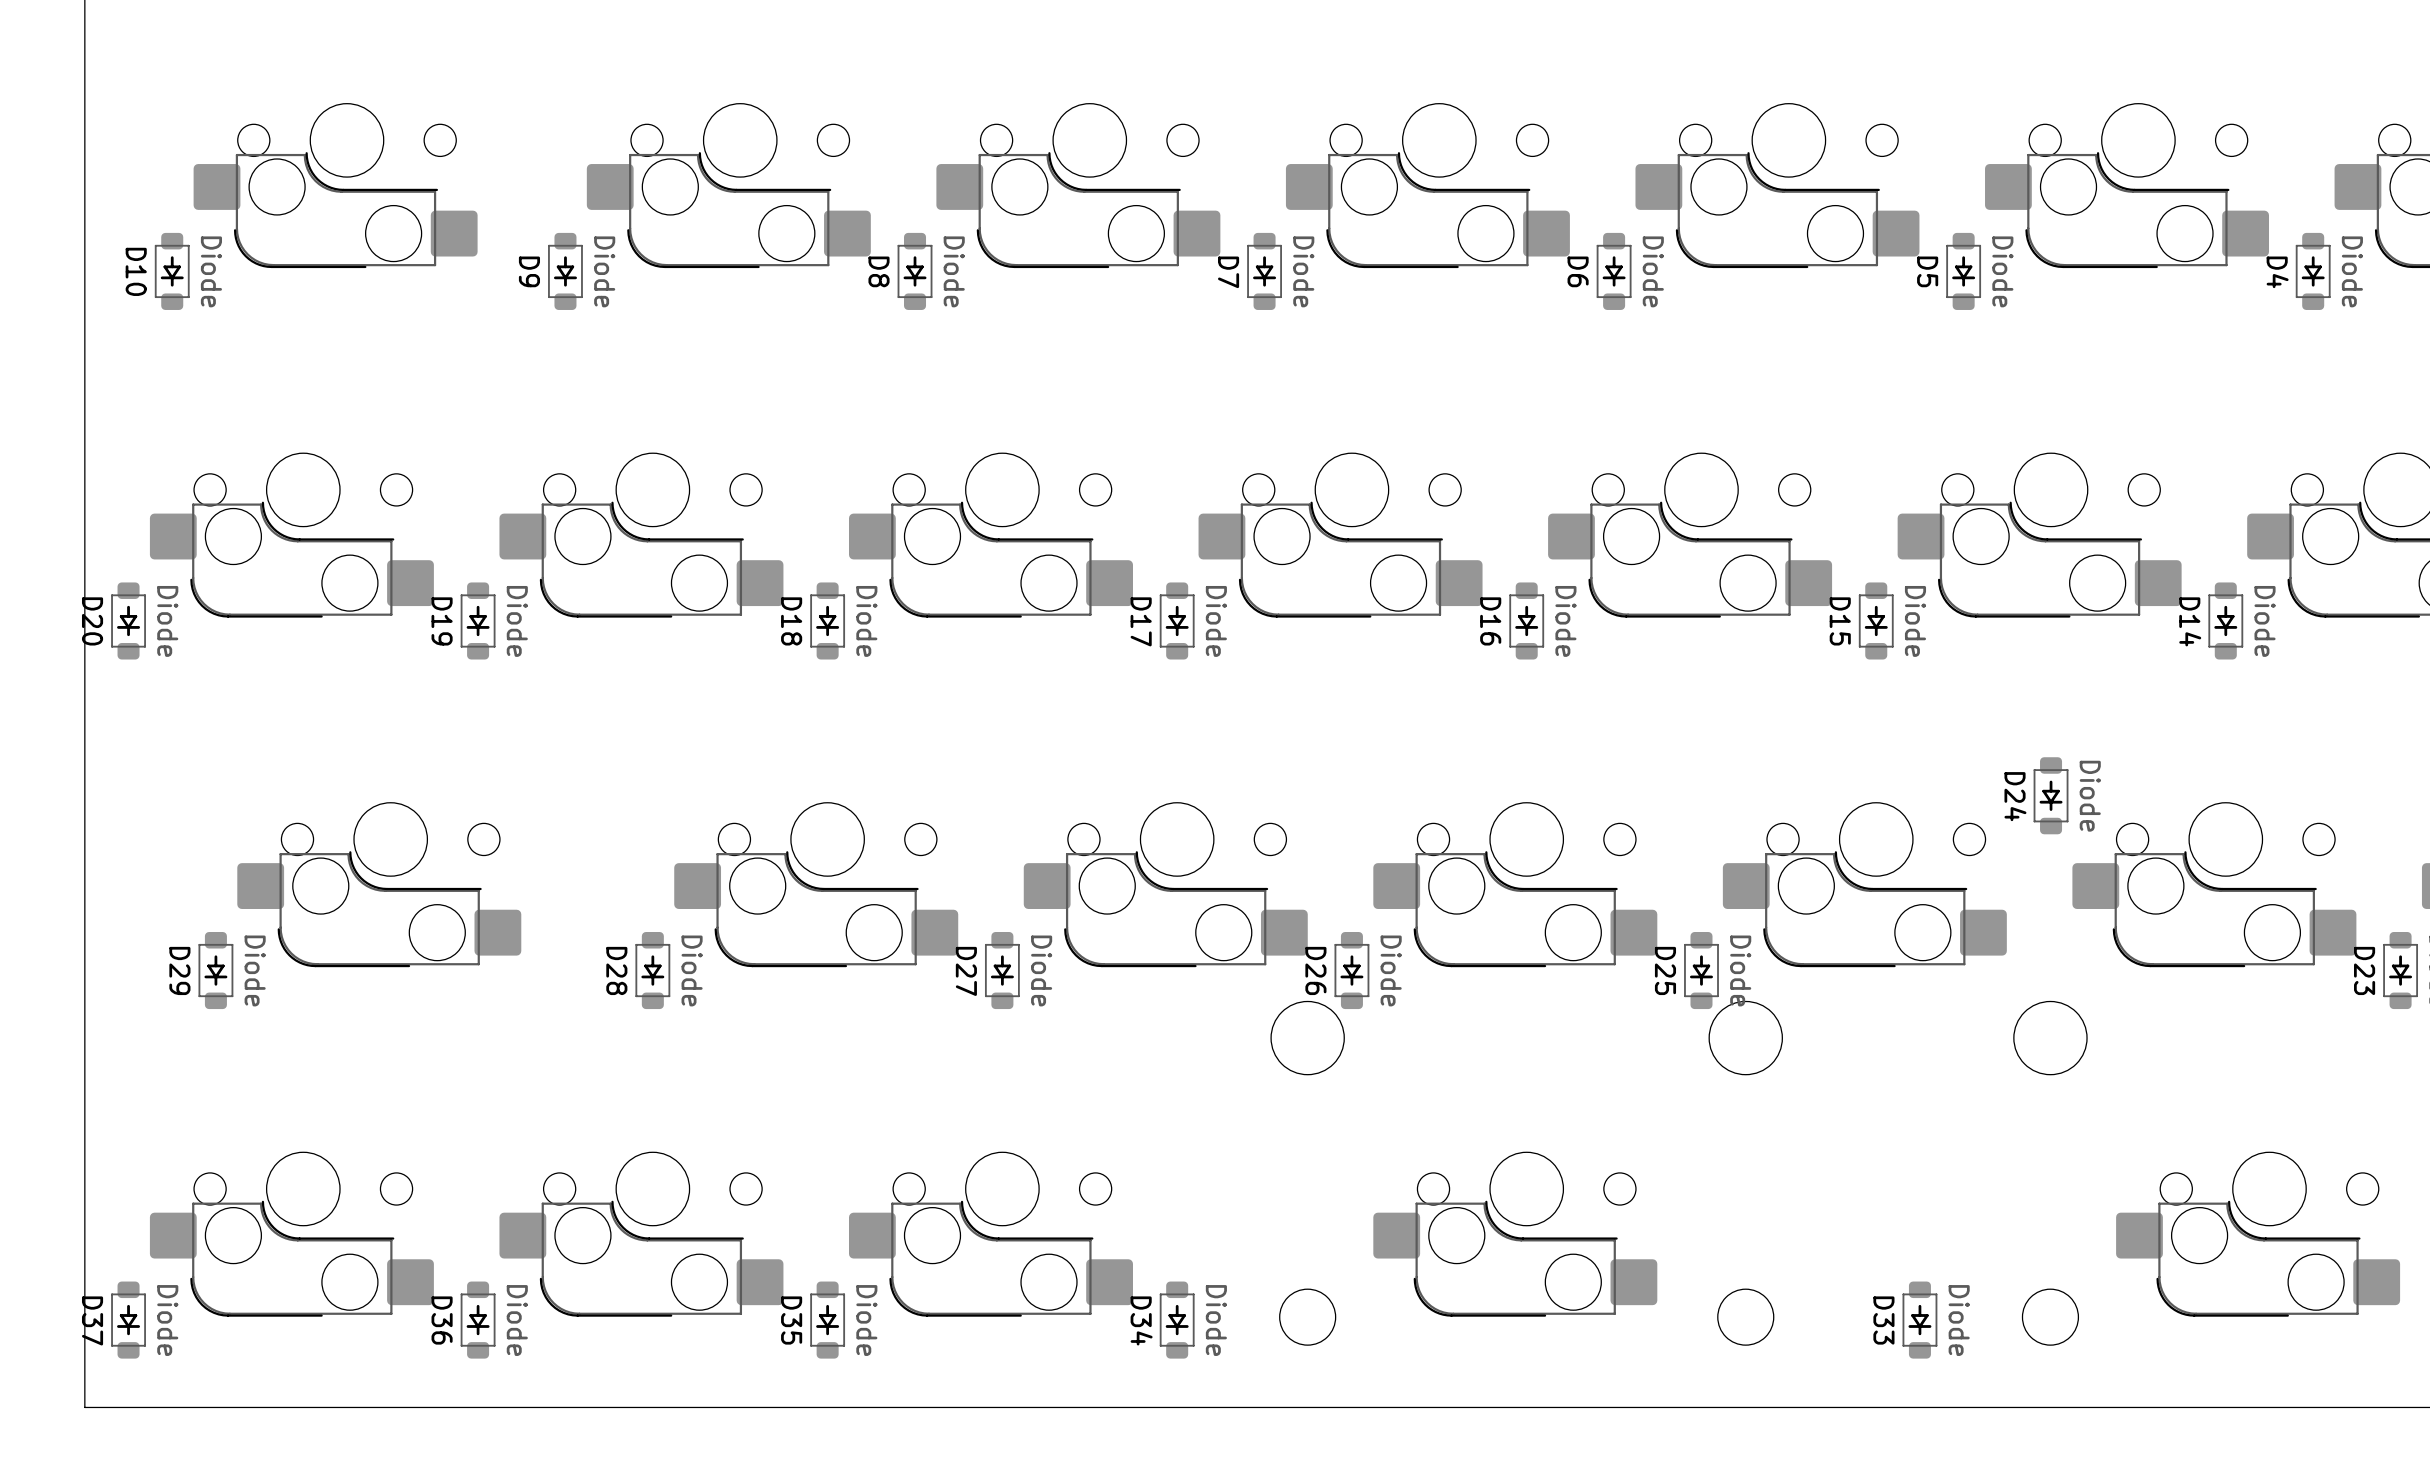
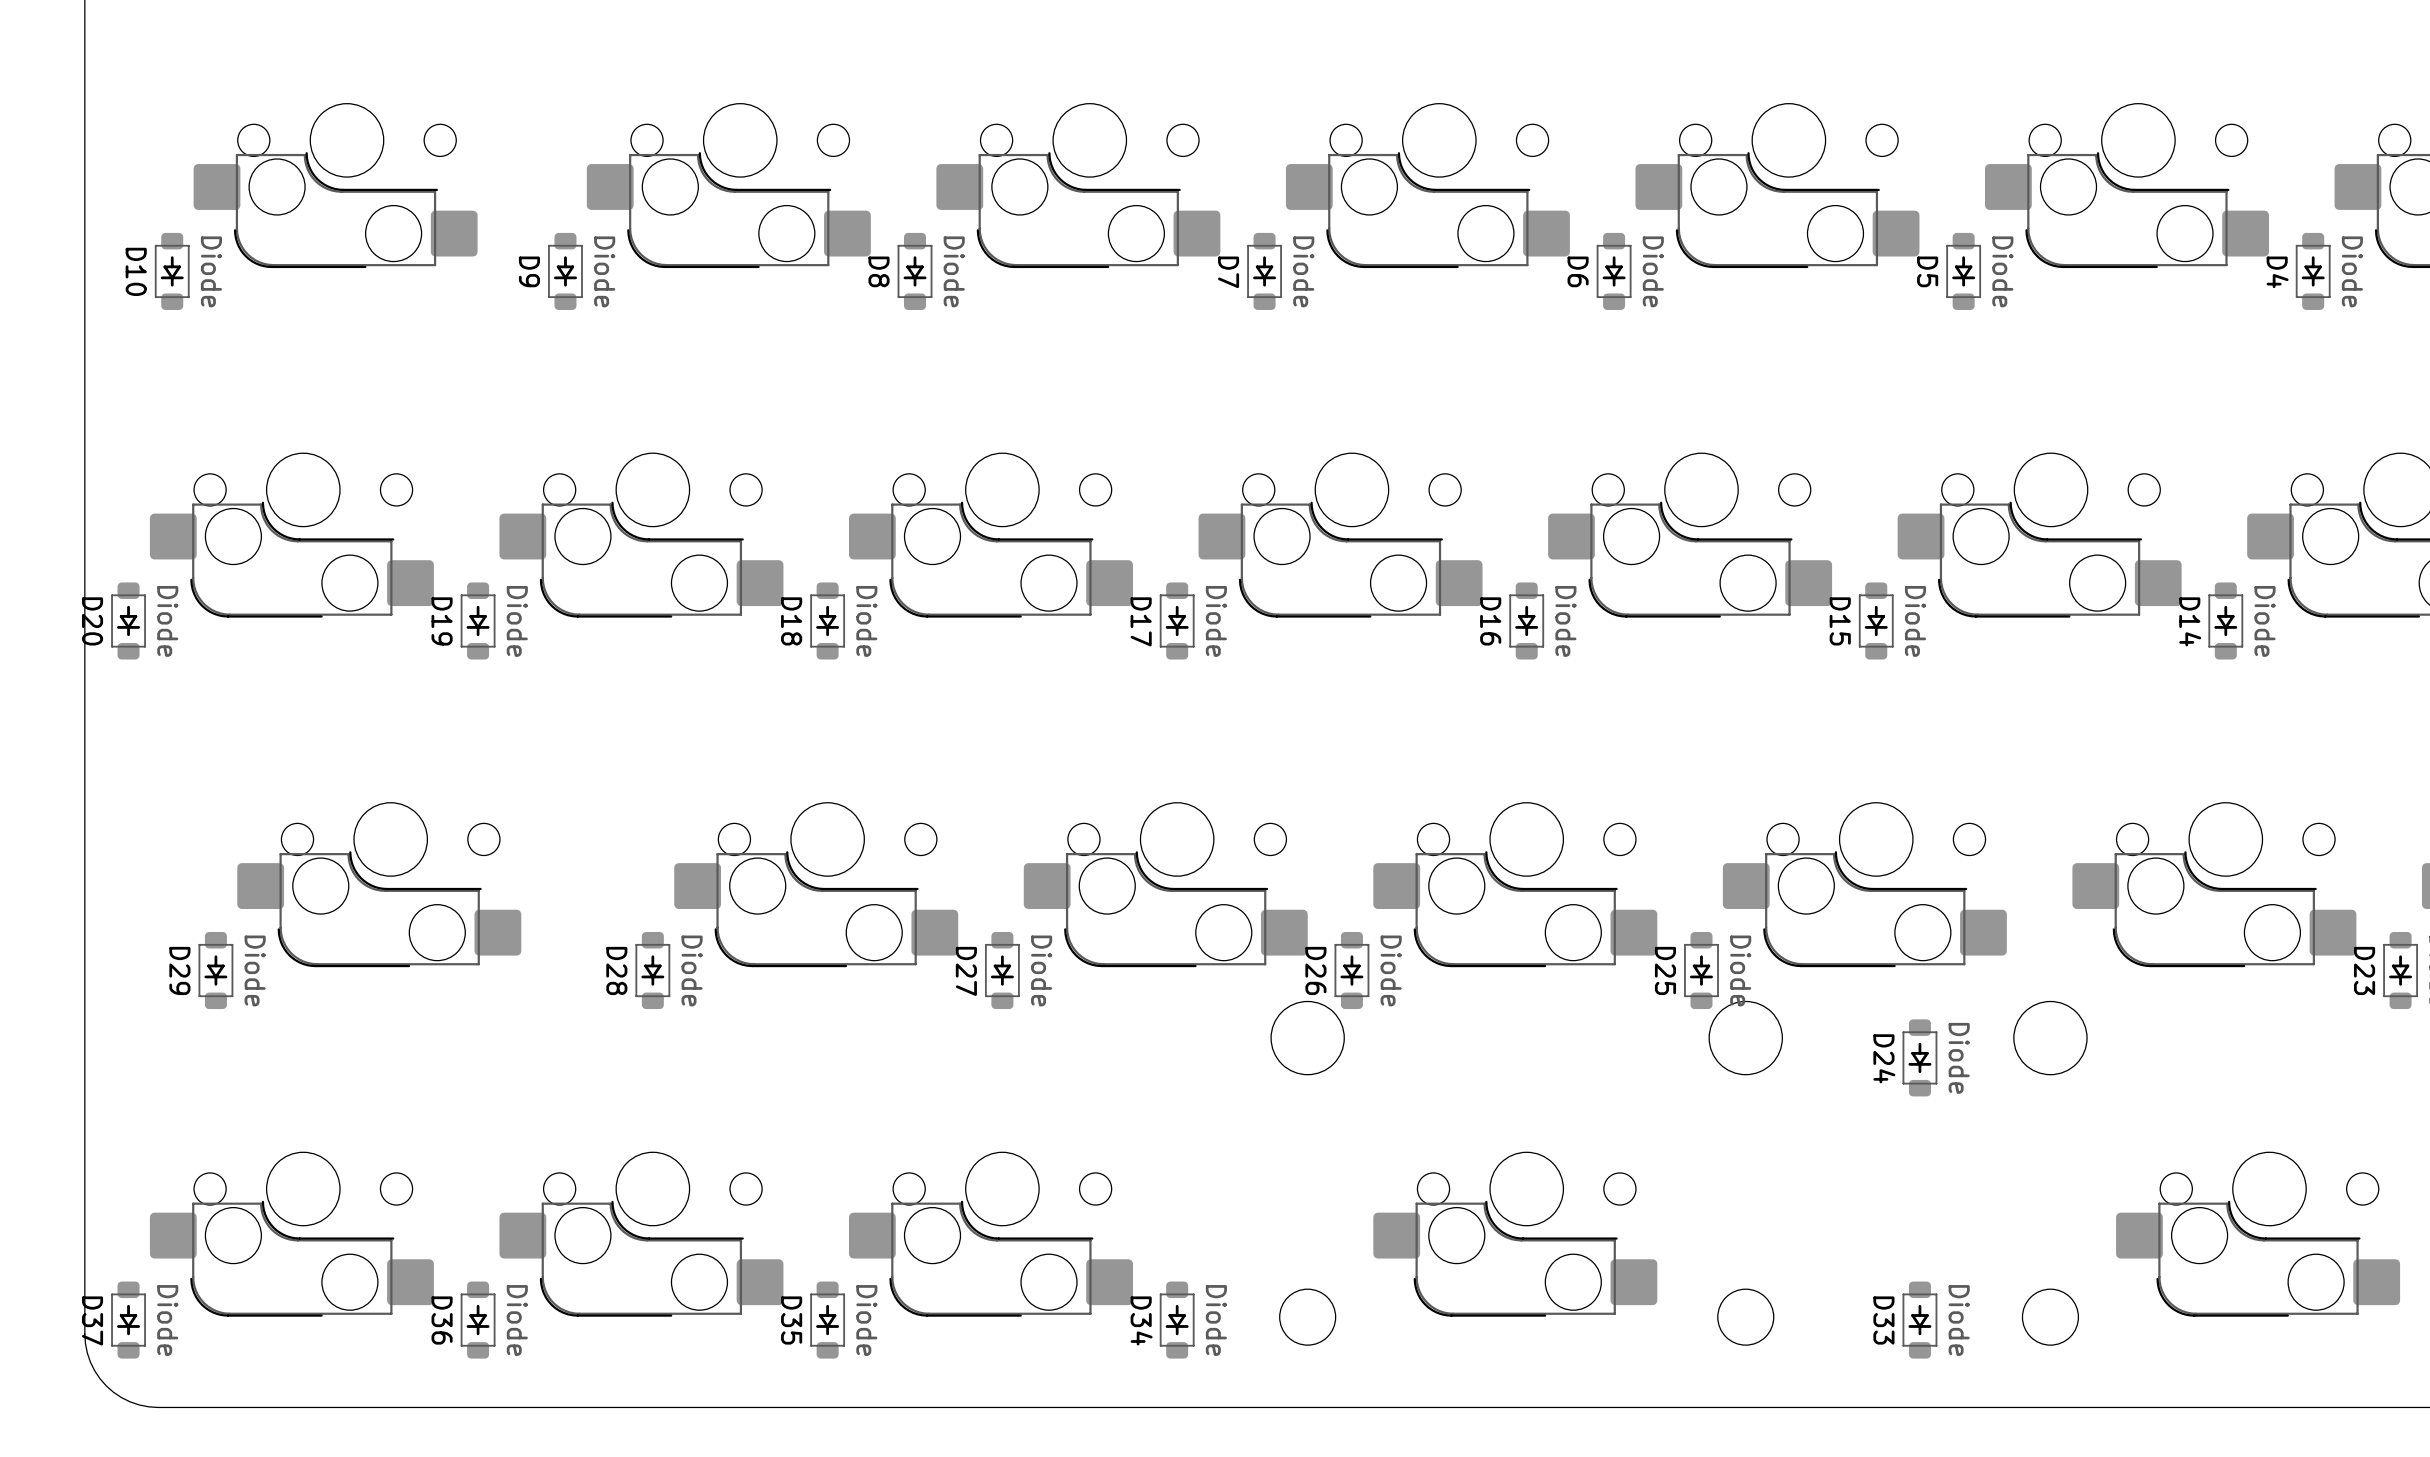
D24 position: (2051, 795) -> (1919, 1057)
board edge: (84, 1334) (84, 1407) (158, 1407) -> (84, 1334) (90, 1362) (106, 1385) (130, 1401) (158, 1407)

